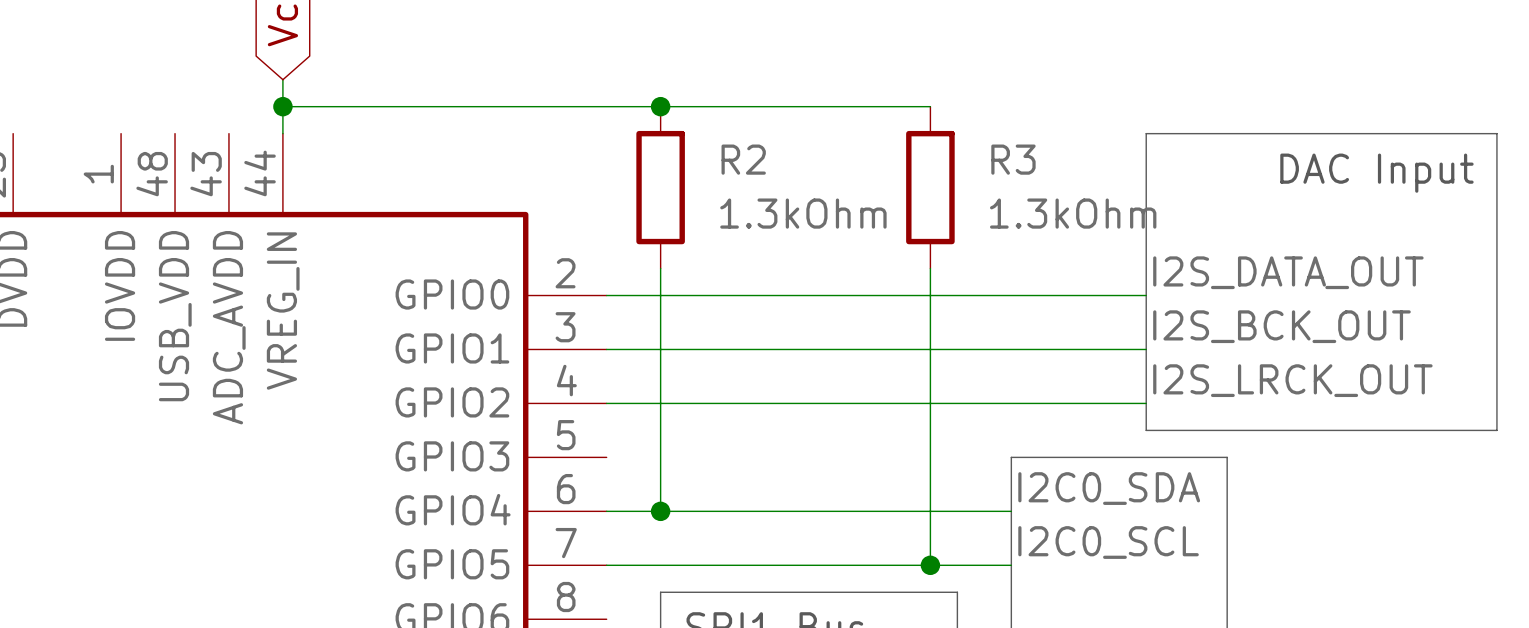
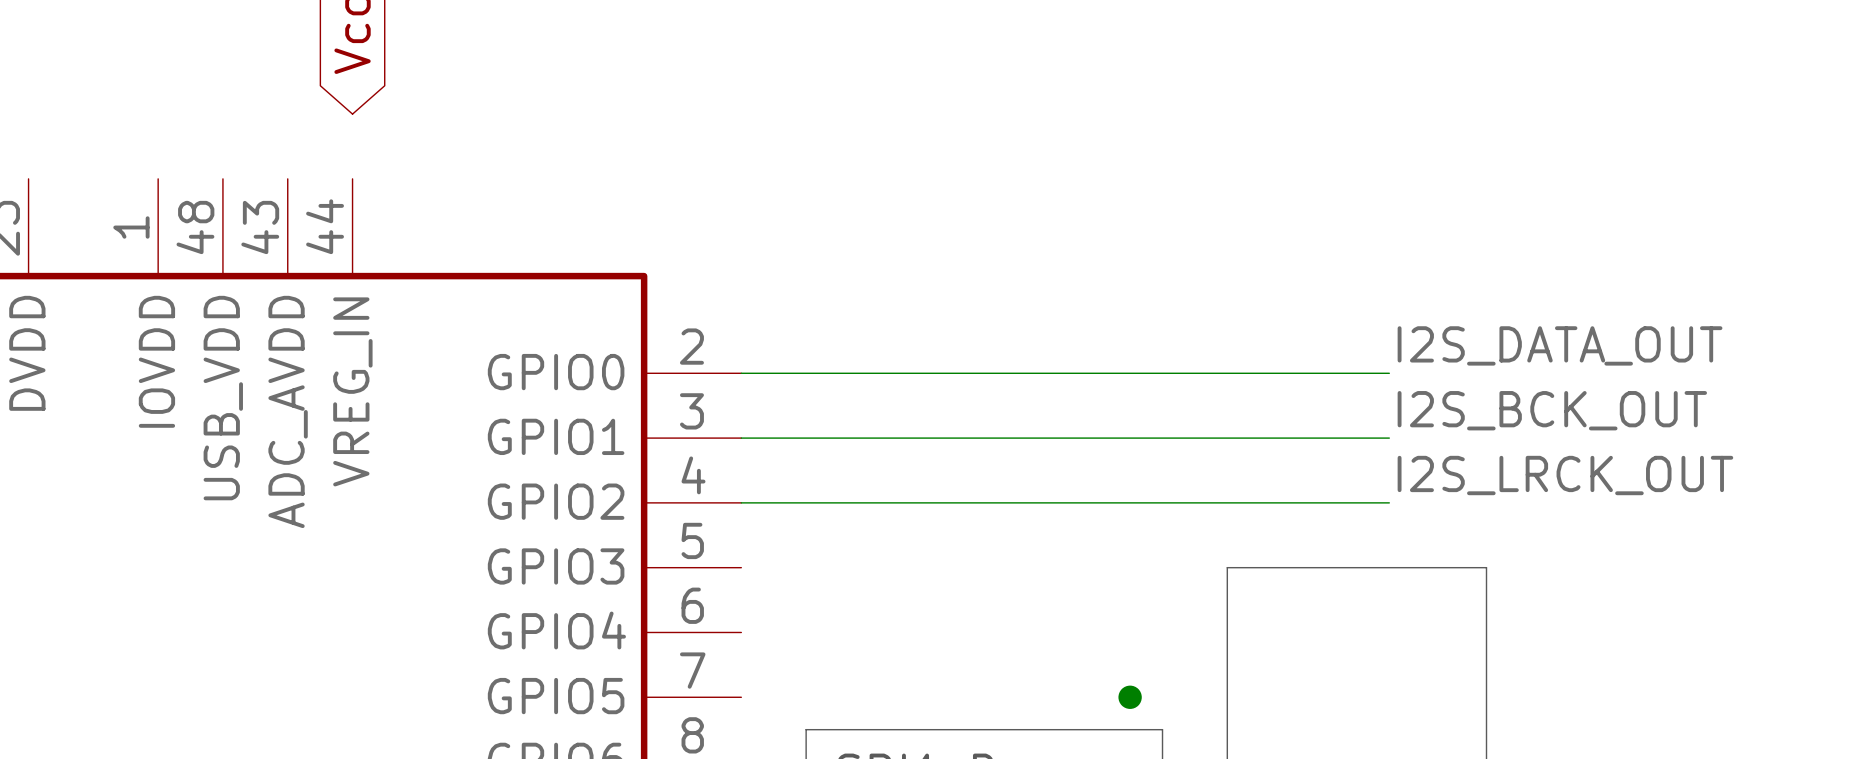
wire: (282, 79) (282, 133) -> none
wire: (282, 106) (930, 106) -> none
junction: (282, 106) -> none
junction: (660, 106) -> none
line: (1146, 133) (1496, 133) (1496, 430) (1146, 430) (1146, 133) -> none
text: DAC Input (1376, 173) -> none
R2: 1.3kOhm (660, 187) -> none
R3: 1.3kOhm (930, 187) -> none
wire: (660, 268) (660, 511) -> none
wire: (930, 268) (930, 565) -> none
label: I2C0_SDA (1109, 488) -> none
wire: (606, 511) (1011, 511) -> none
junction: (660, 511) -> none
label: I2C0_SCL (1108, 542) -> none
wire: (606, 565) (1011, 565) -> none

